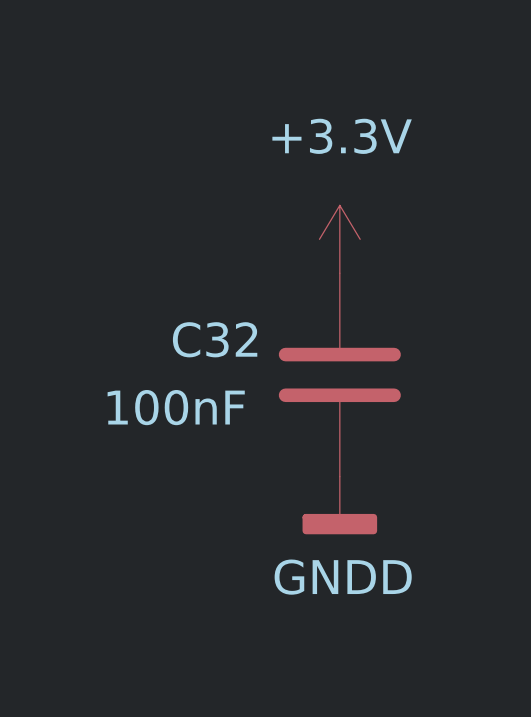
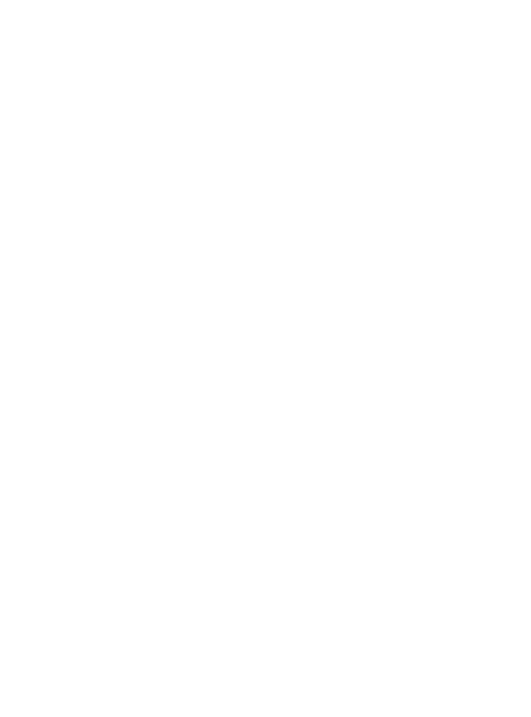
power symbol: +3.3V (339, 239) -> none
C32: 100nF (339, 374) -> none
power symbol: GNDD (339, 505) -> none

